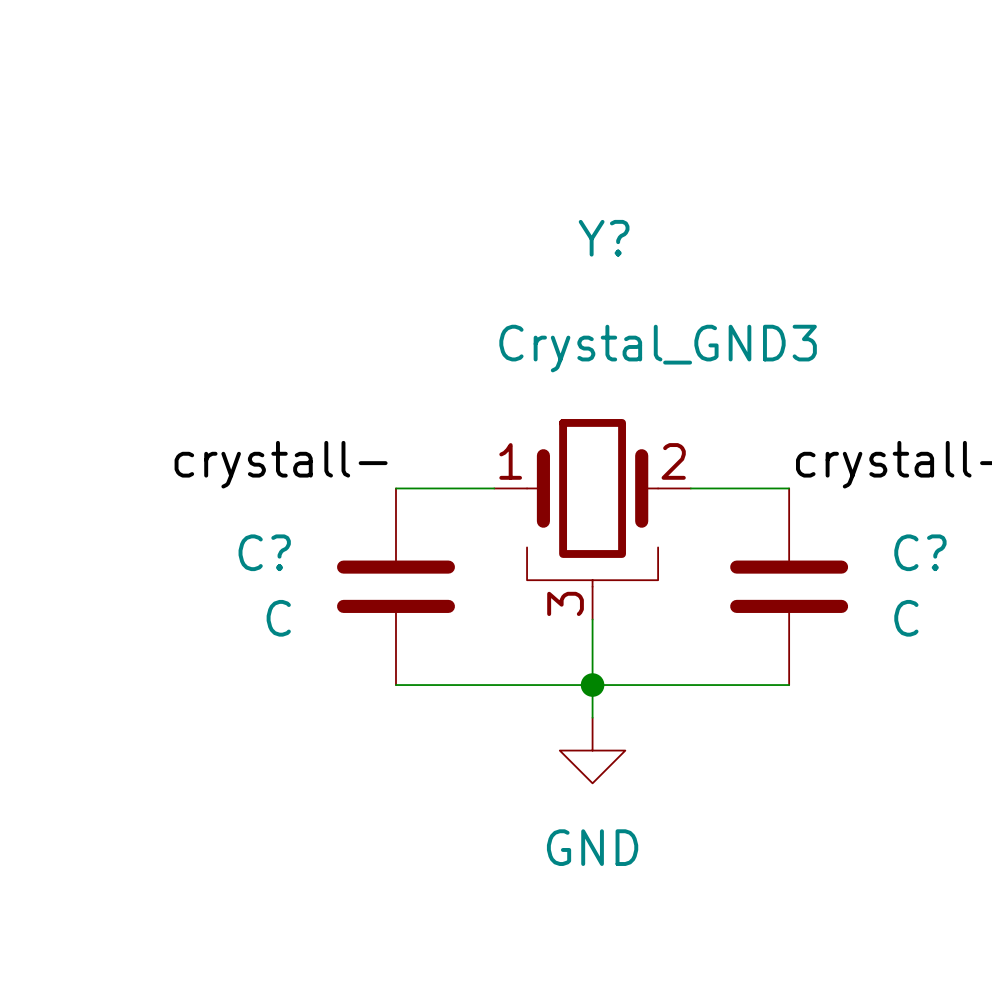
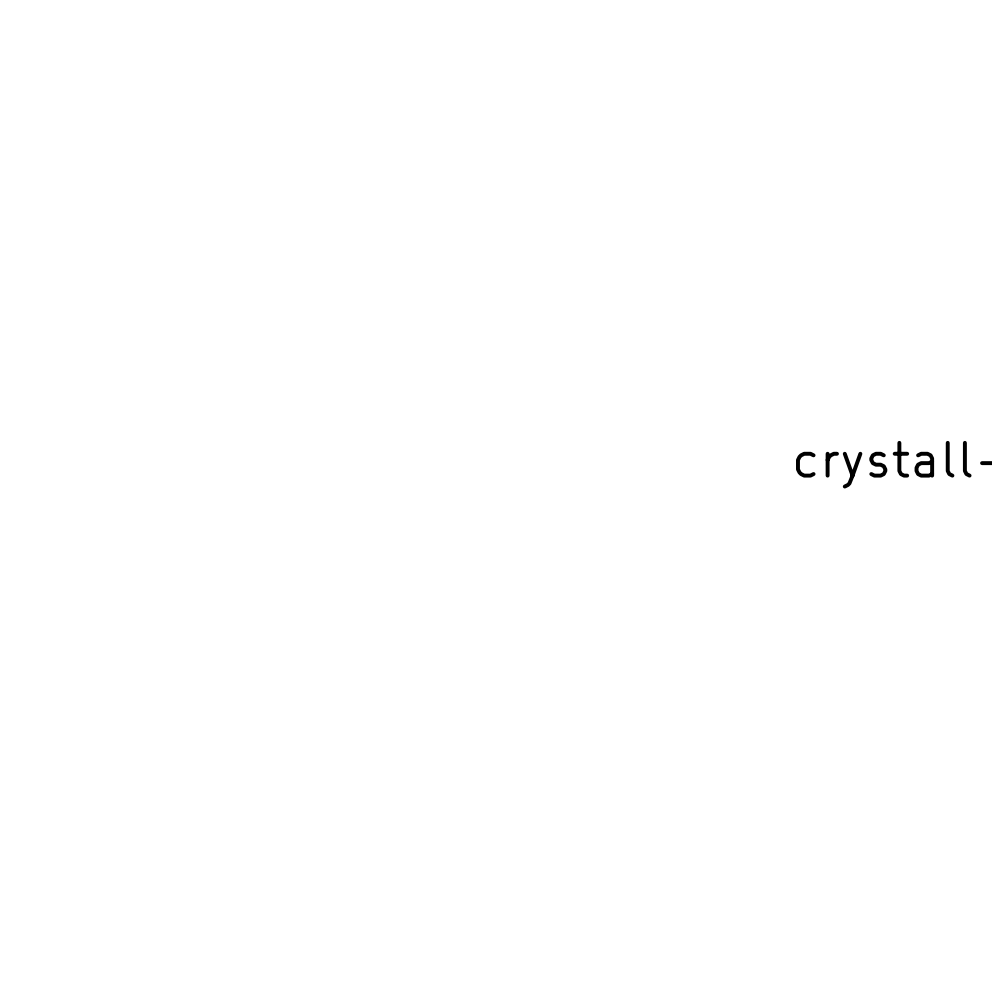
label: crystall- (281, 464) -> none
wire: (395, 488) (494, 488) -> none
wire: (690, 488) (789, 488) -> none
Y?: Crystal_GND3 (592, 519) -> none
C?: C (395, 586) -> none
C?: C (789, 586) -> none
wire: (592, 619) (592, 717) -> none
wire: (395, 685) (789, 685) -> none
junction: (592, 685) -> none
power symbol: GND (592, 750) -> none

